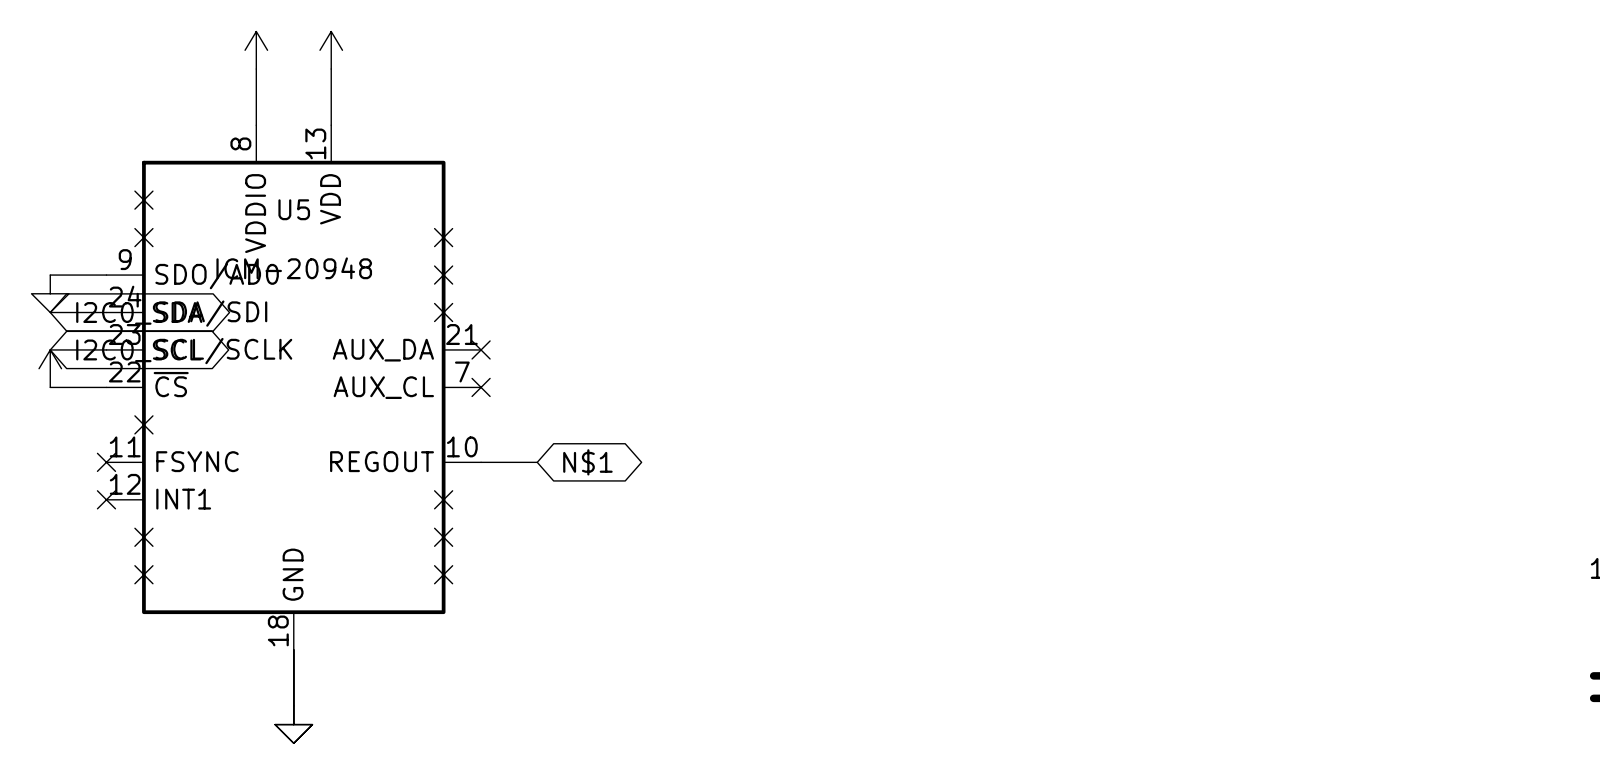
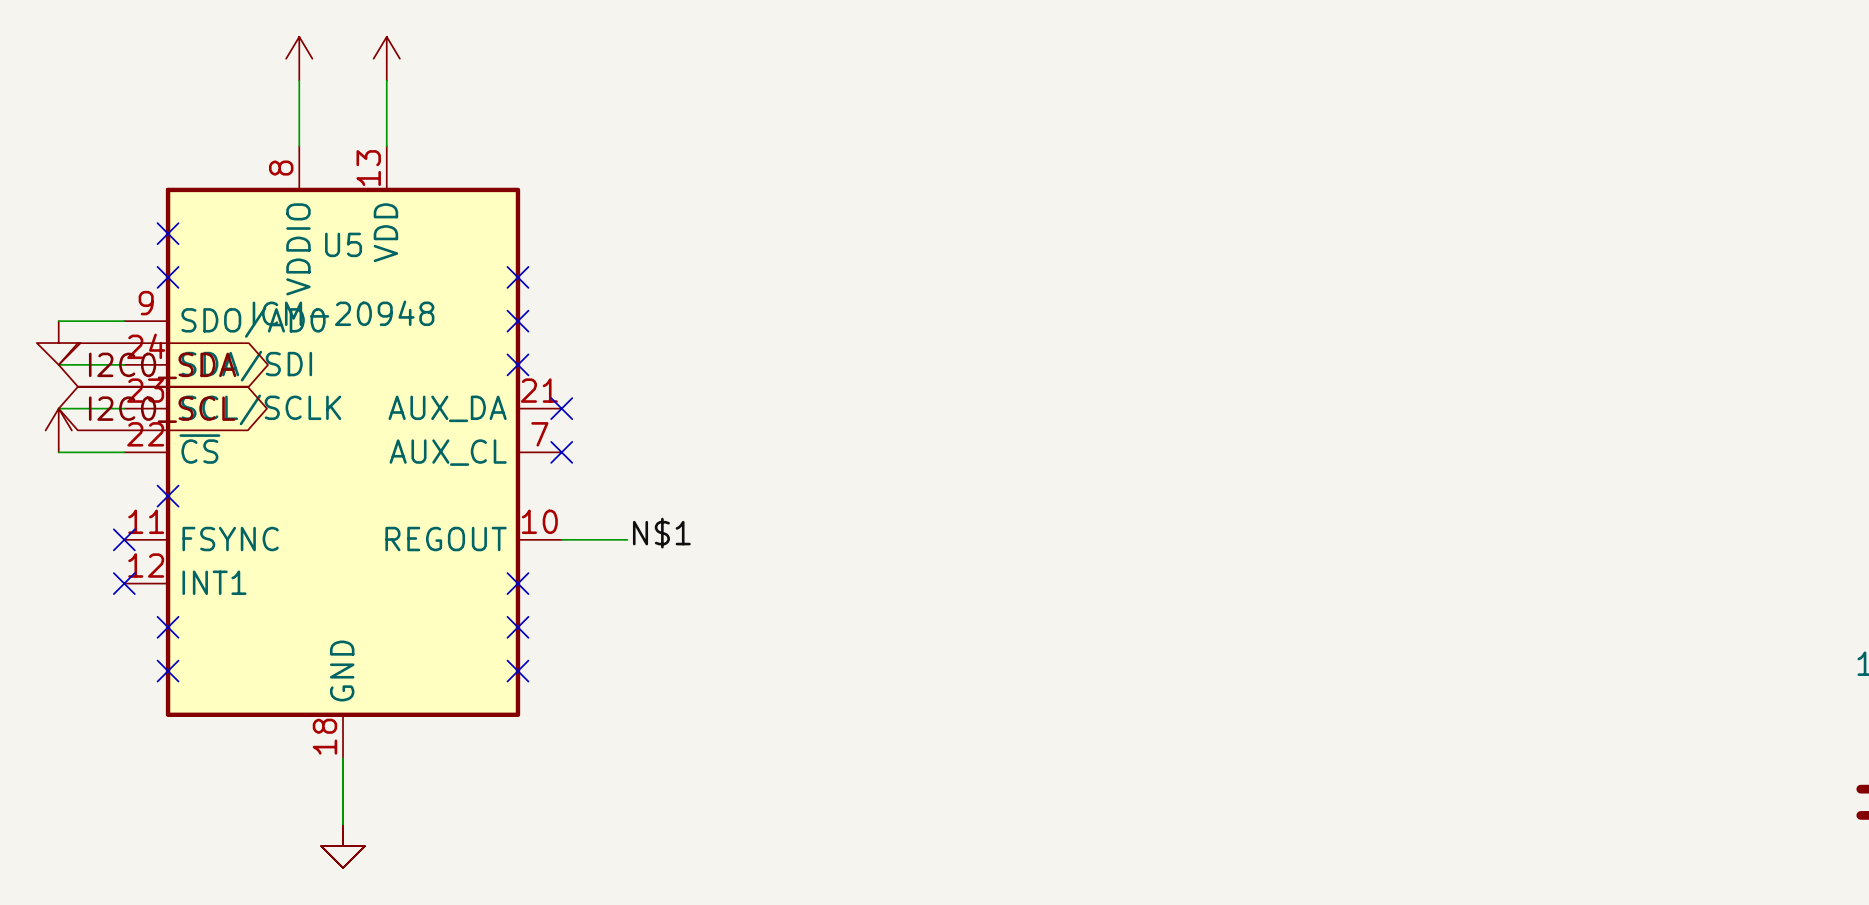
label: none -> N$1 (661, 533)
global label: N$1 (587, 462) -> none

